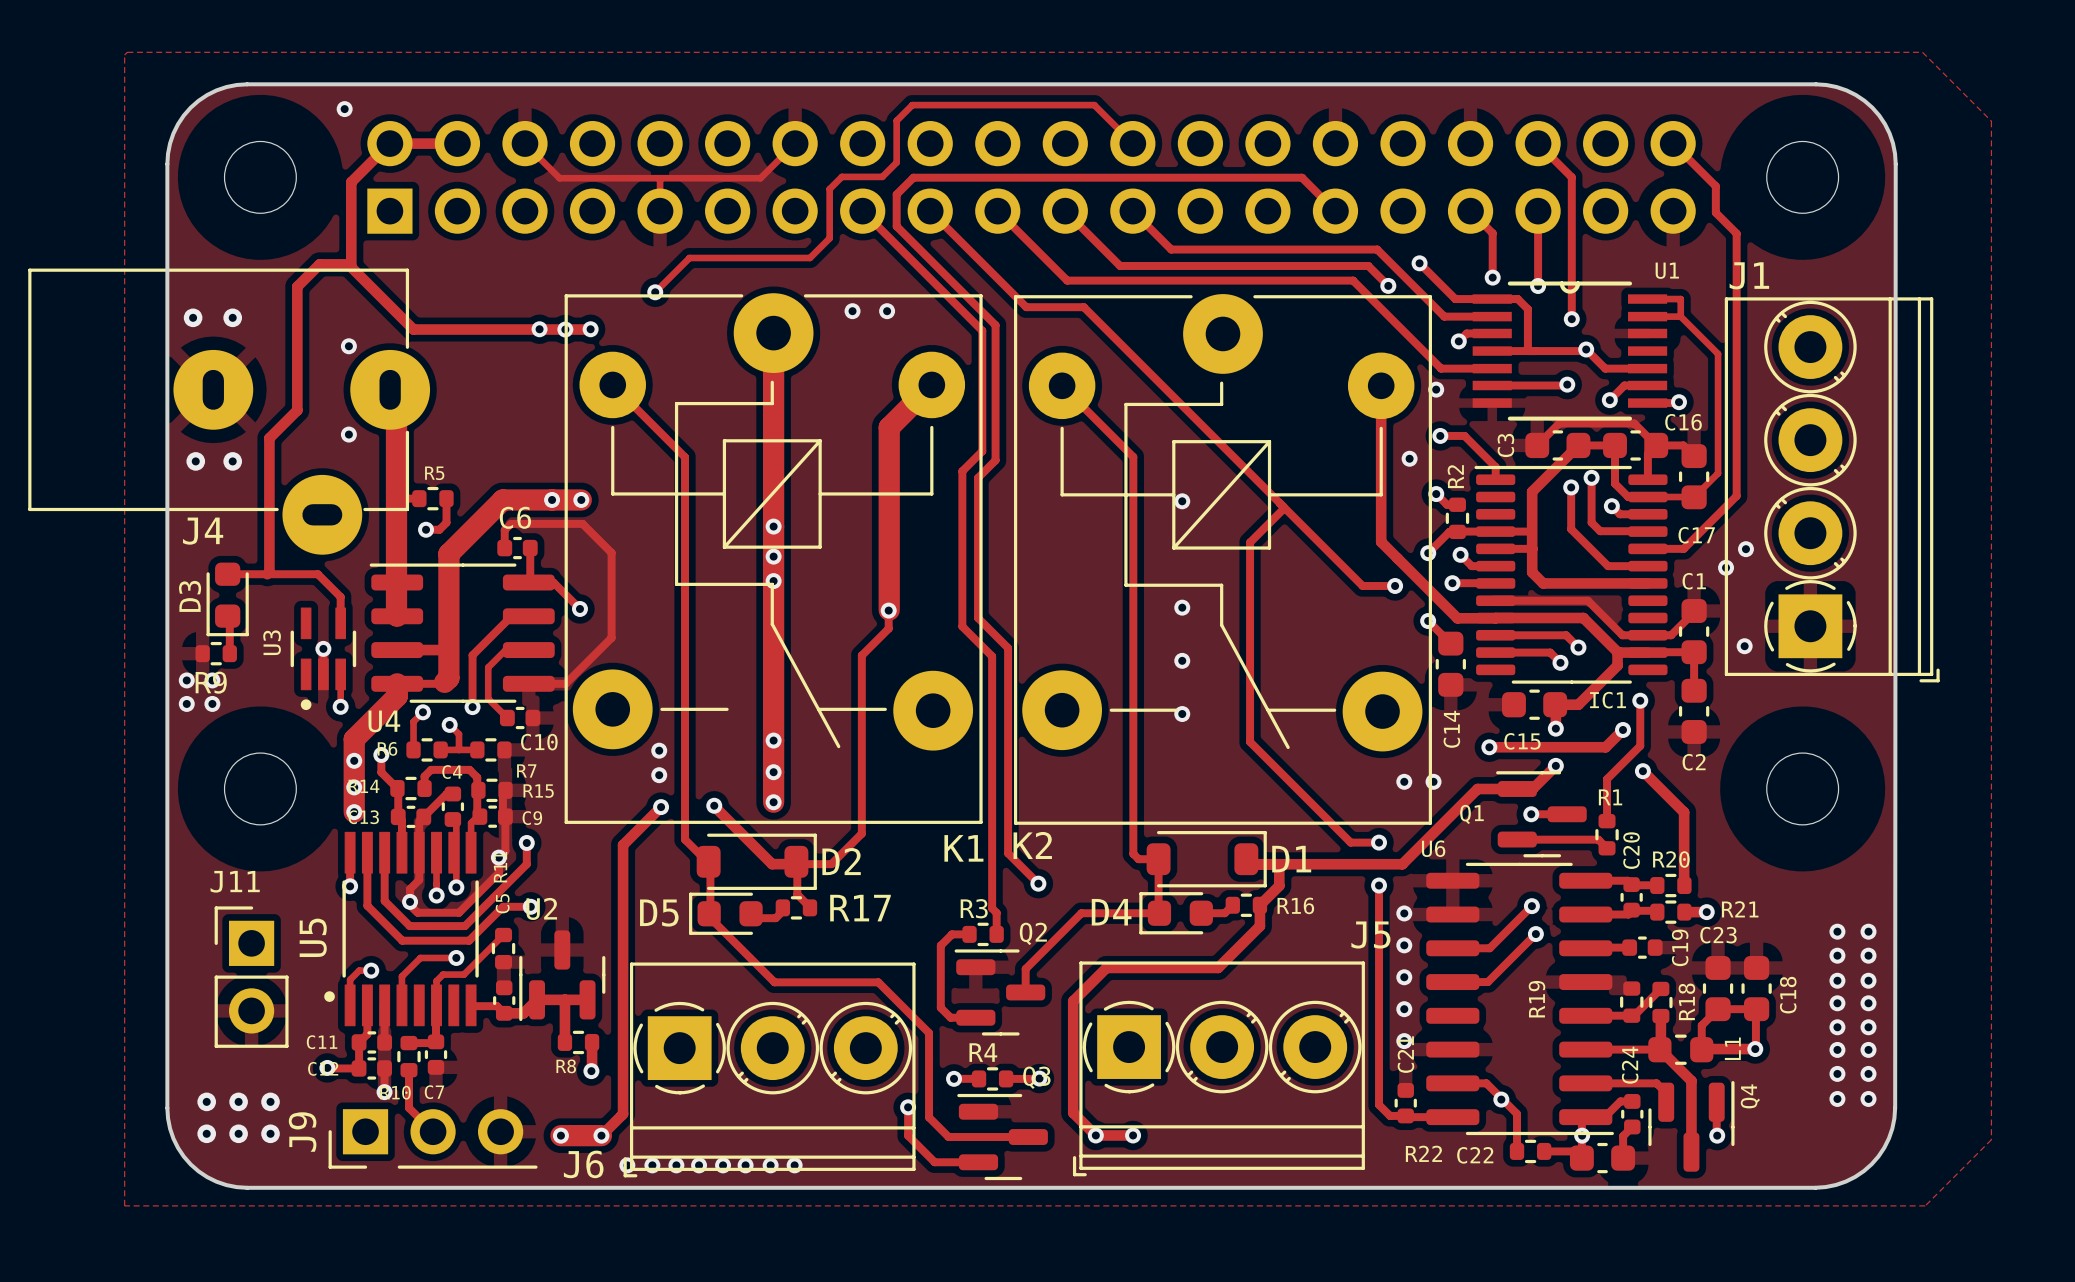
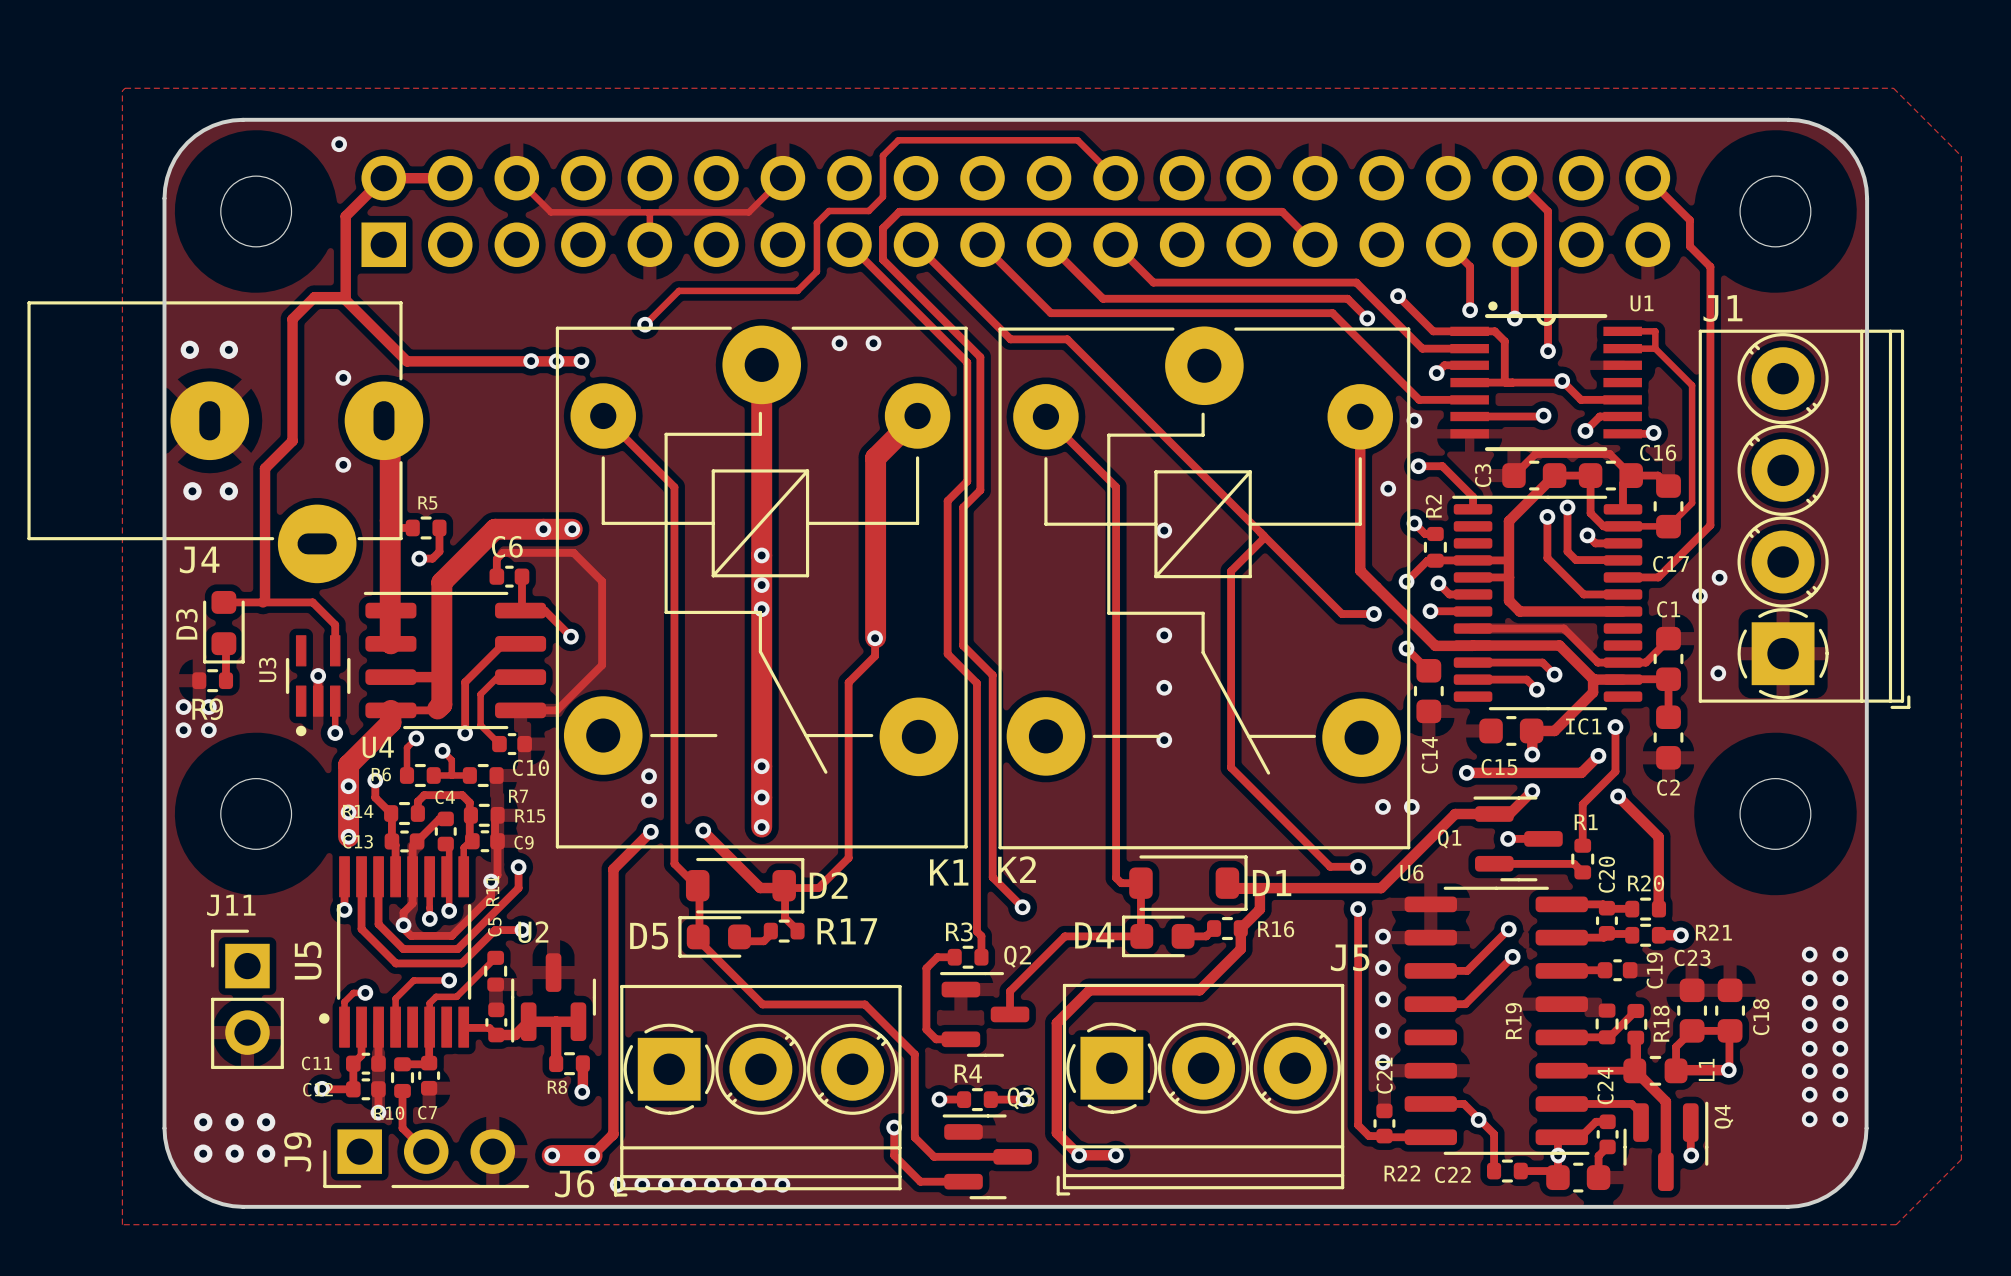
U1 footprint: [1472, 281, 1668, 421] -> [1450, 301, 1642, 452]

